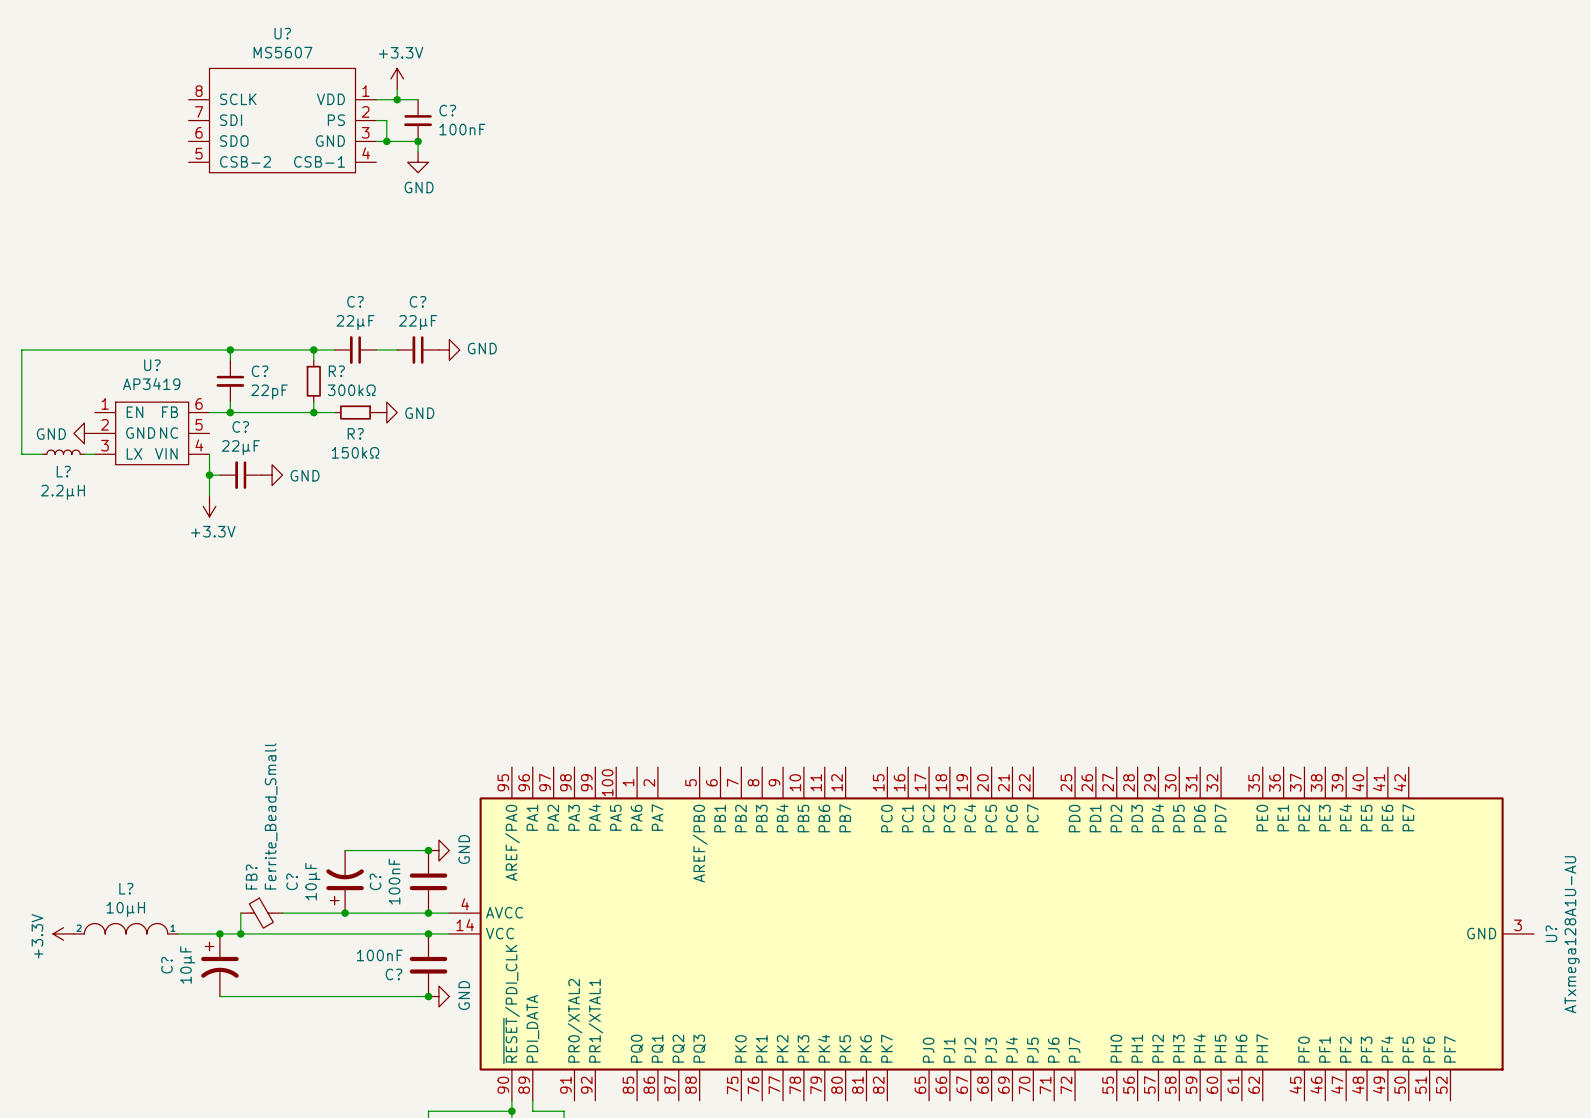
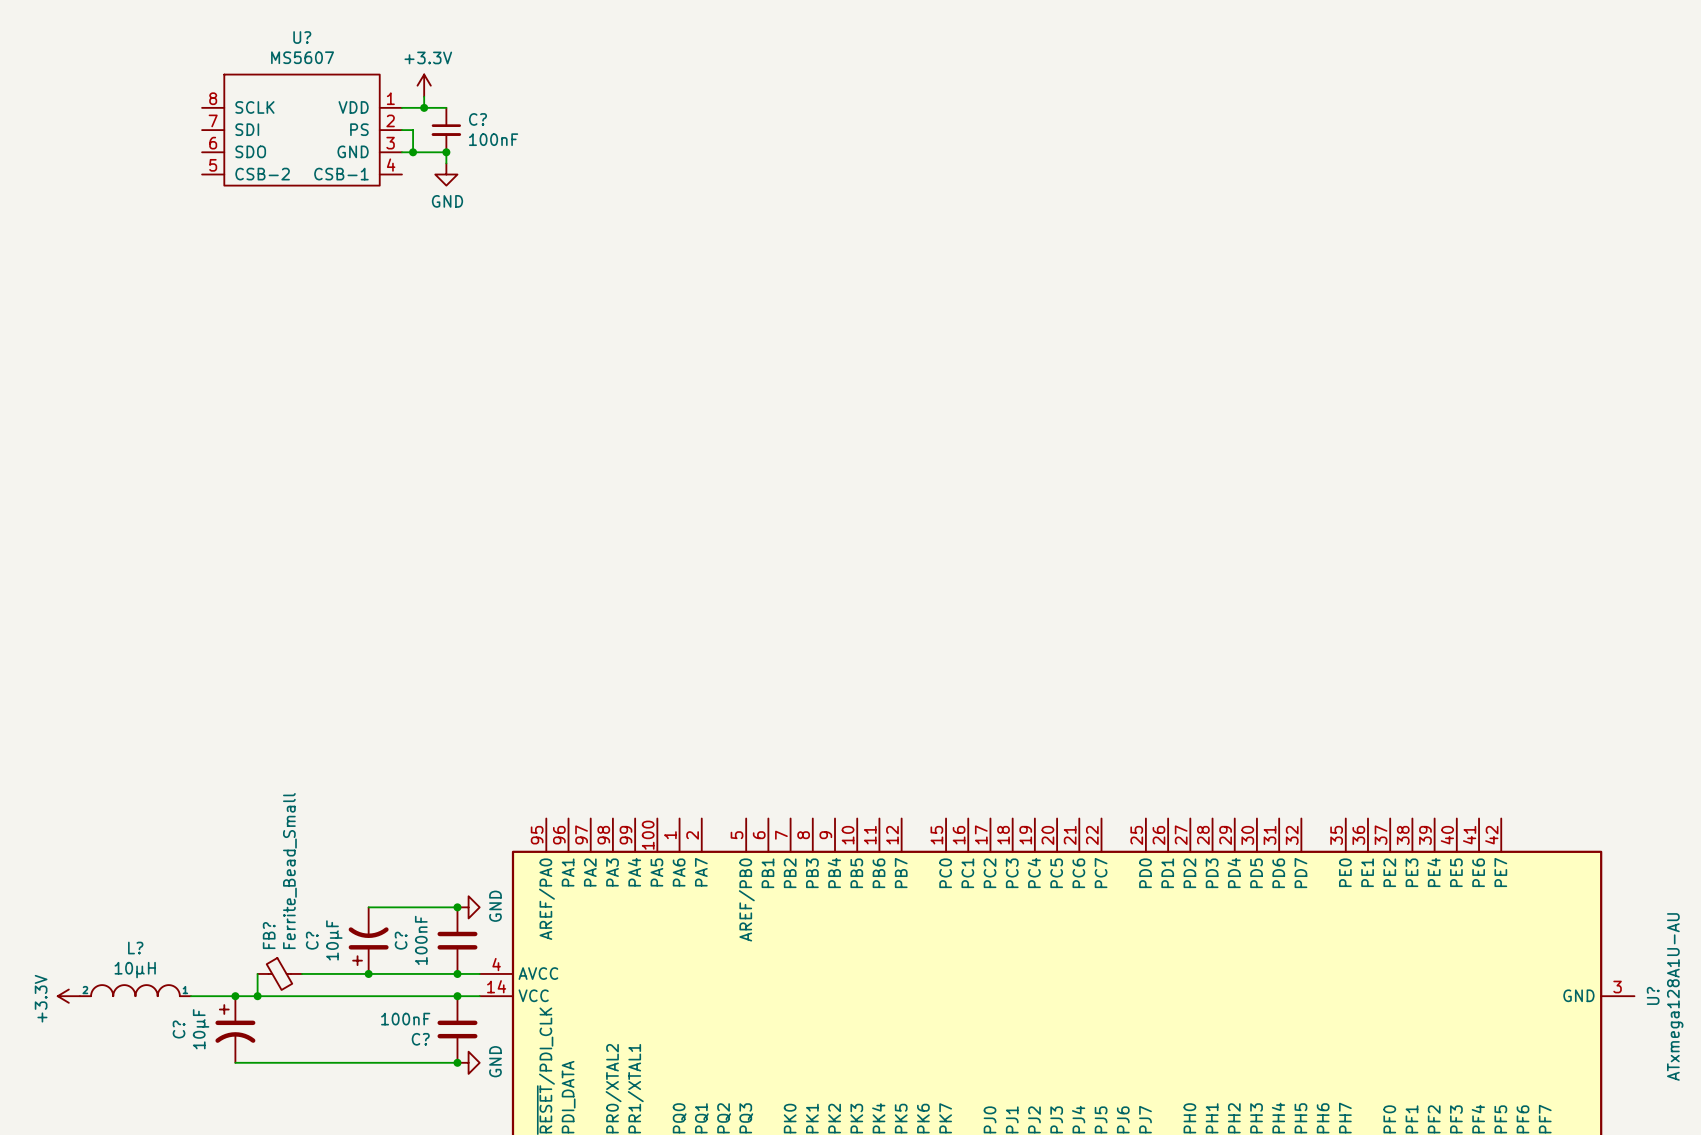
wire: (230, 349) (230, 360) -> none
junction: (230, 349) -> none
wire: (313, 349) (313, 360) -> none
junction: (313, 349) -> none
wire: (334, 349) (21, 349) (21, 454) (42, 454) -> none
C?: 22µF (355, 349) -> none
wire: (376, 349) (397, 349) -> none
C?: 22µF (418, 349) -> none
power symbol: GND (449, 349) -> none
C?: 22pF (230, 381) -> none
R?: 300kΩ (313, 381) -> none
wire: (230, 402) (230, 412) -> none
wire: (313, 402) (313, 412) -> none
wire: (209, 412) (334, 412) -> none
junction: (230, 412) -> none
junction: (313, 412) -> none
R?: 150kΩ (355, 412) -> none
power symbol: GND (386, 412) -> none
power symbol: GND (84, 433) -> none
U?: AP3419 (152, 433) -> none
L?: 2.2µH (63, 452) -> none
wire: (84, 454) (94, 454) -> none
wire: (209, 454) (209, 495) -> none
wire: (209, 475) (219, 475) -> none
junction: (209, 475) -> none
C?: 22µF (240, 475) -> none
power symbol: GND (272, 475) -> none
power symbol: +3.3V (209, 506) -> none

